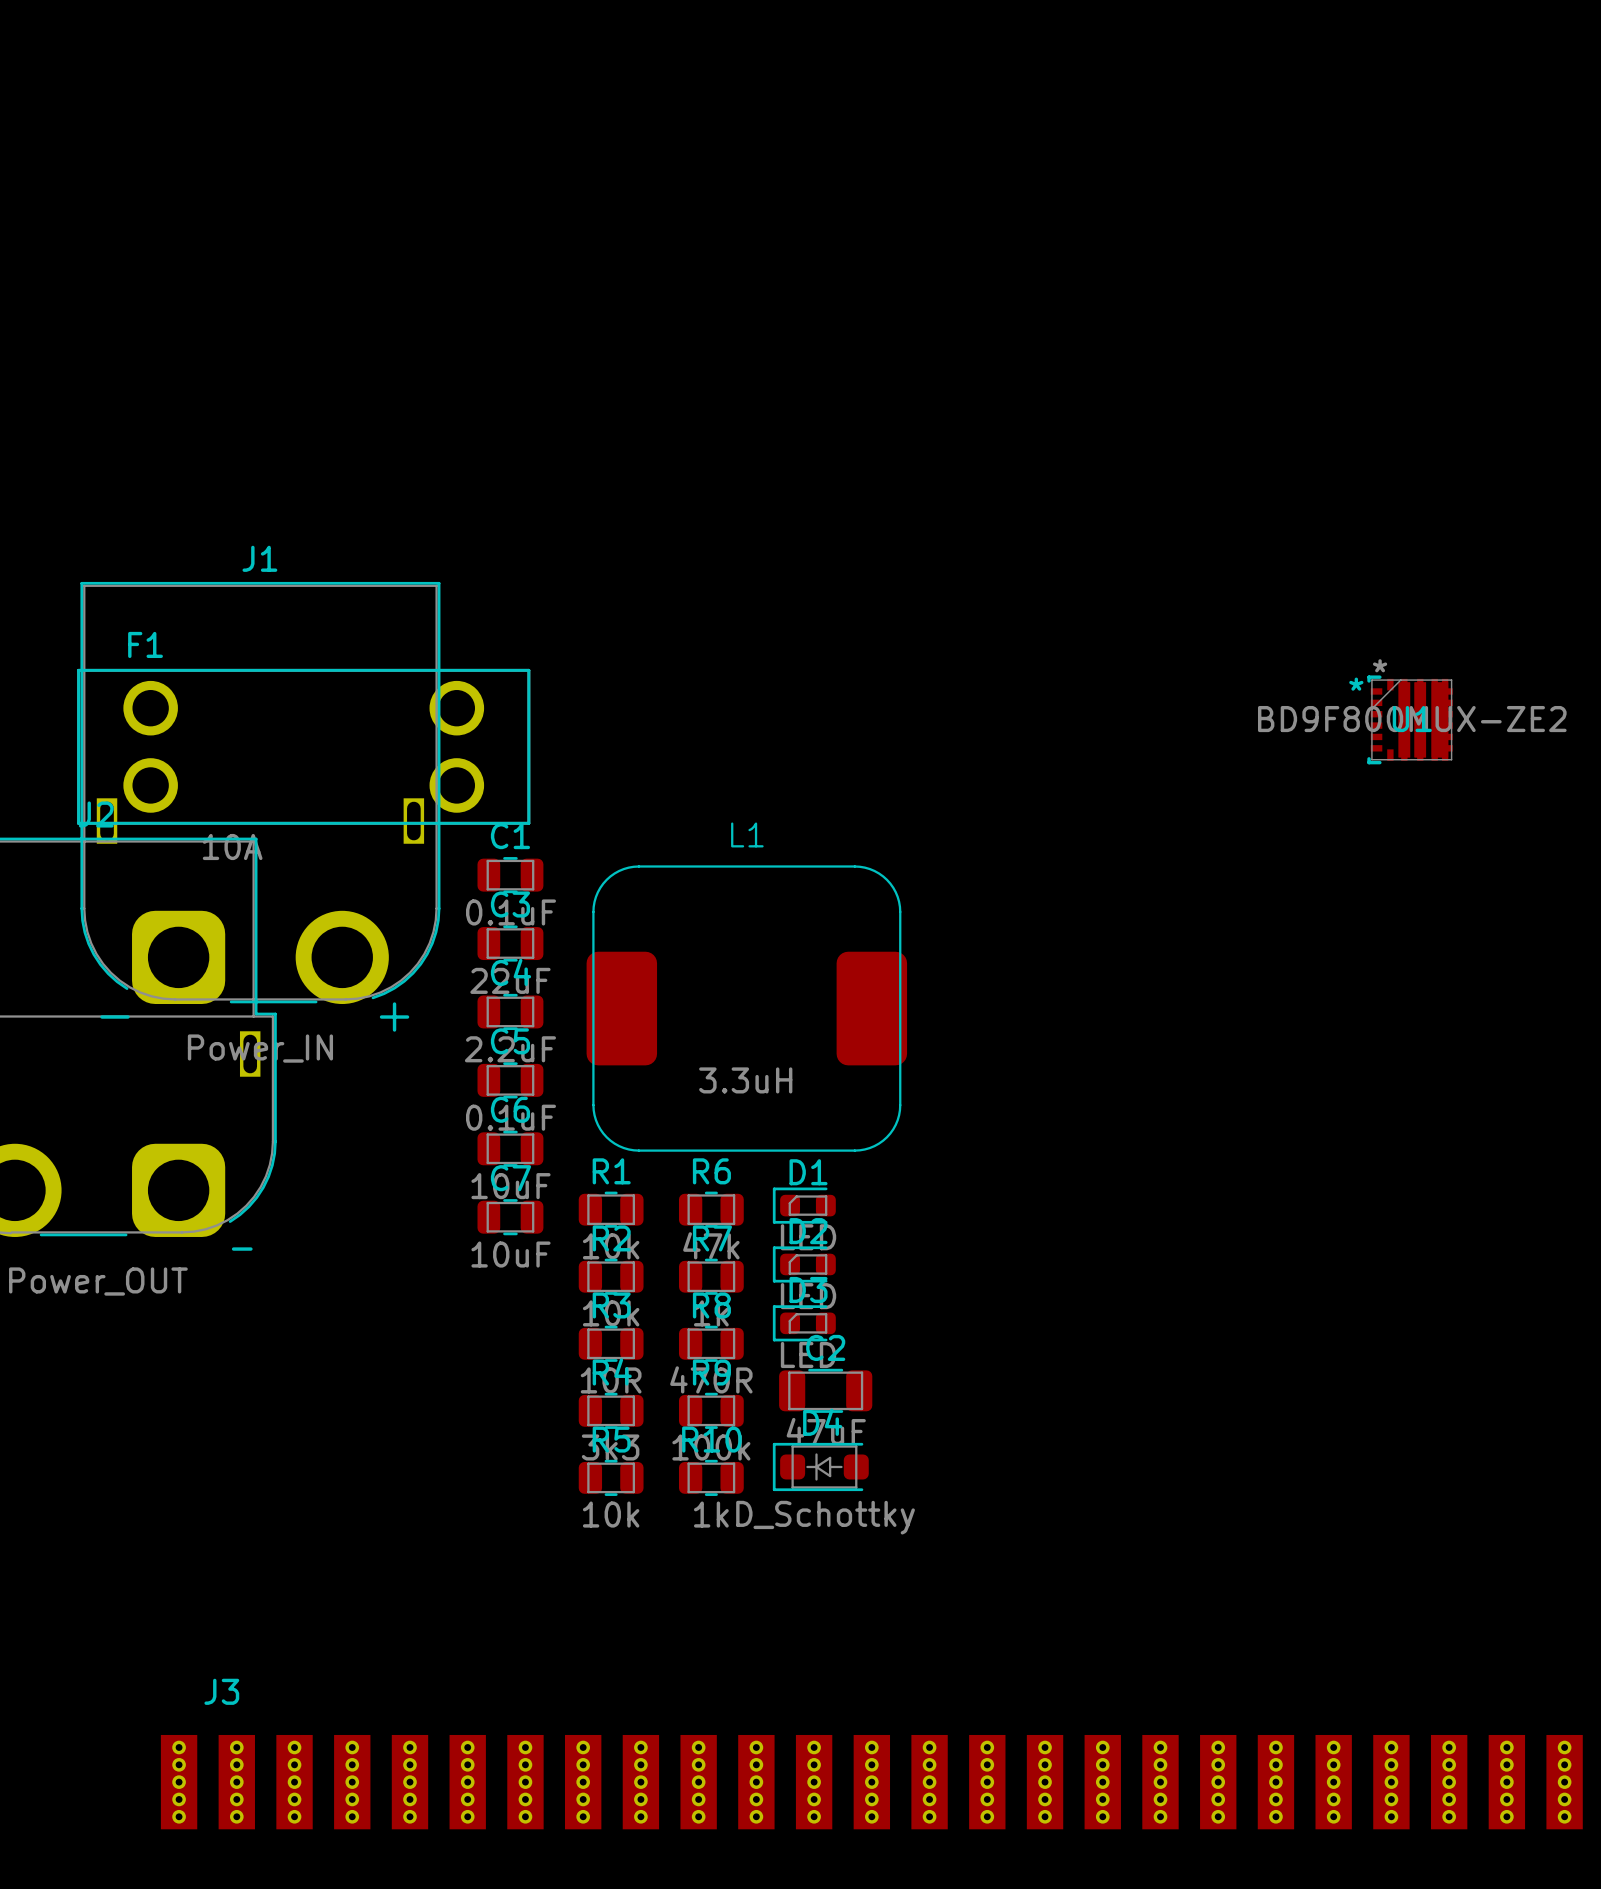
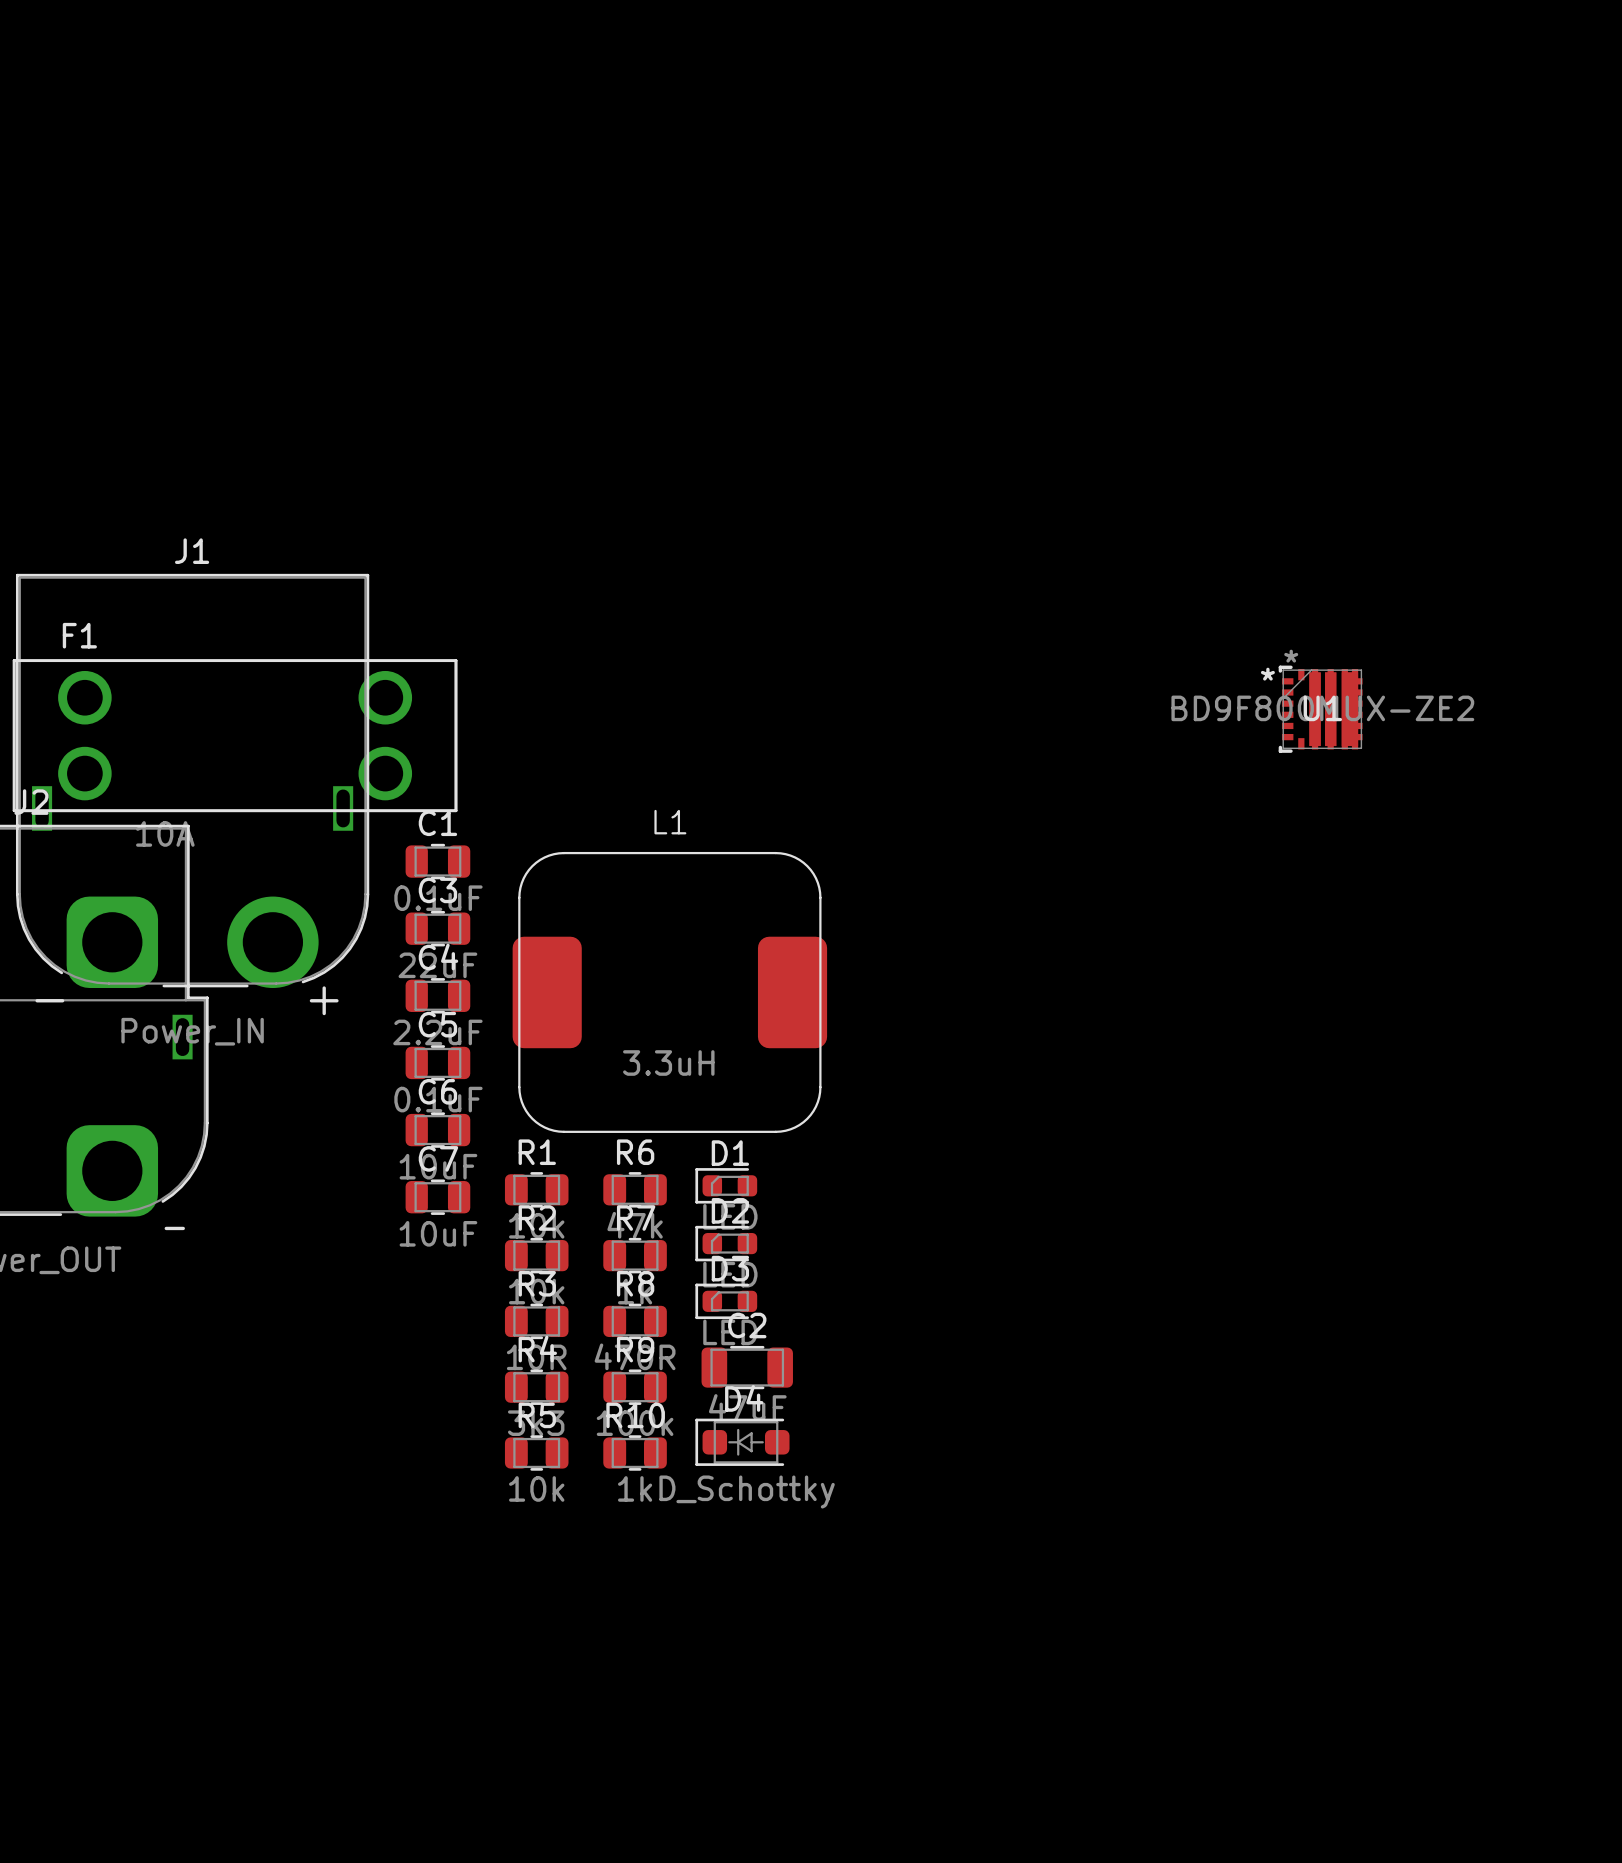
J3: (871, 1782) -> none

